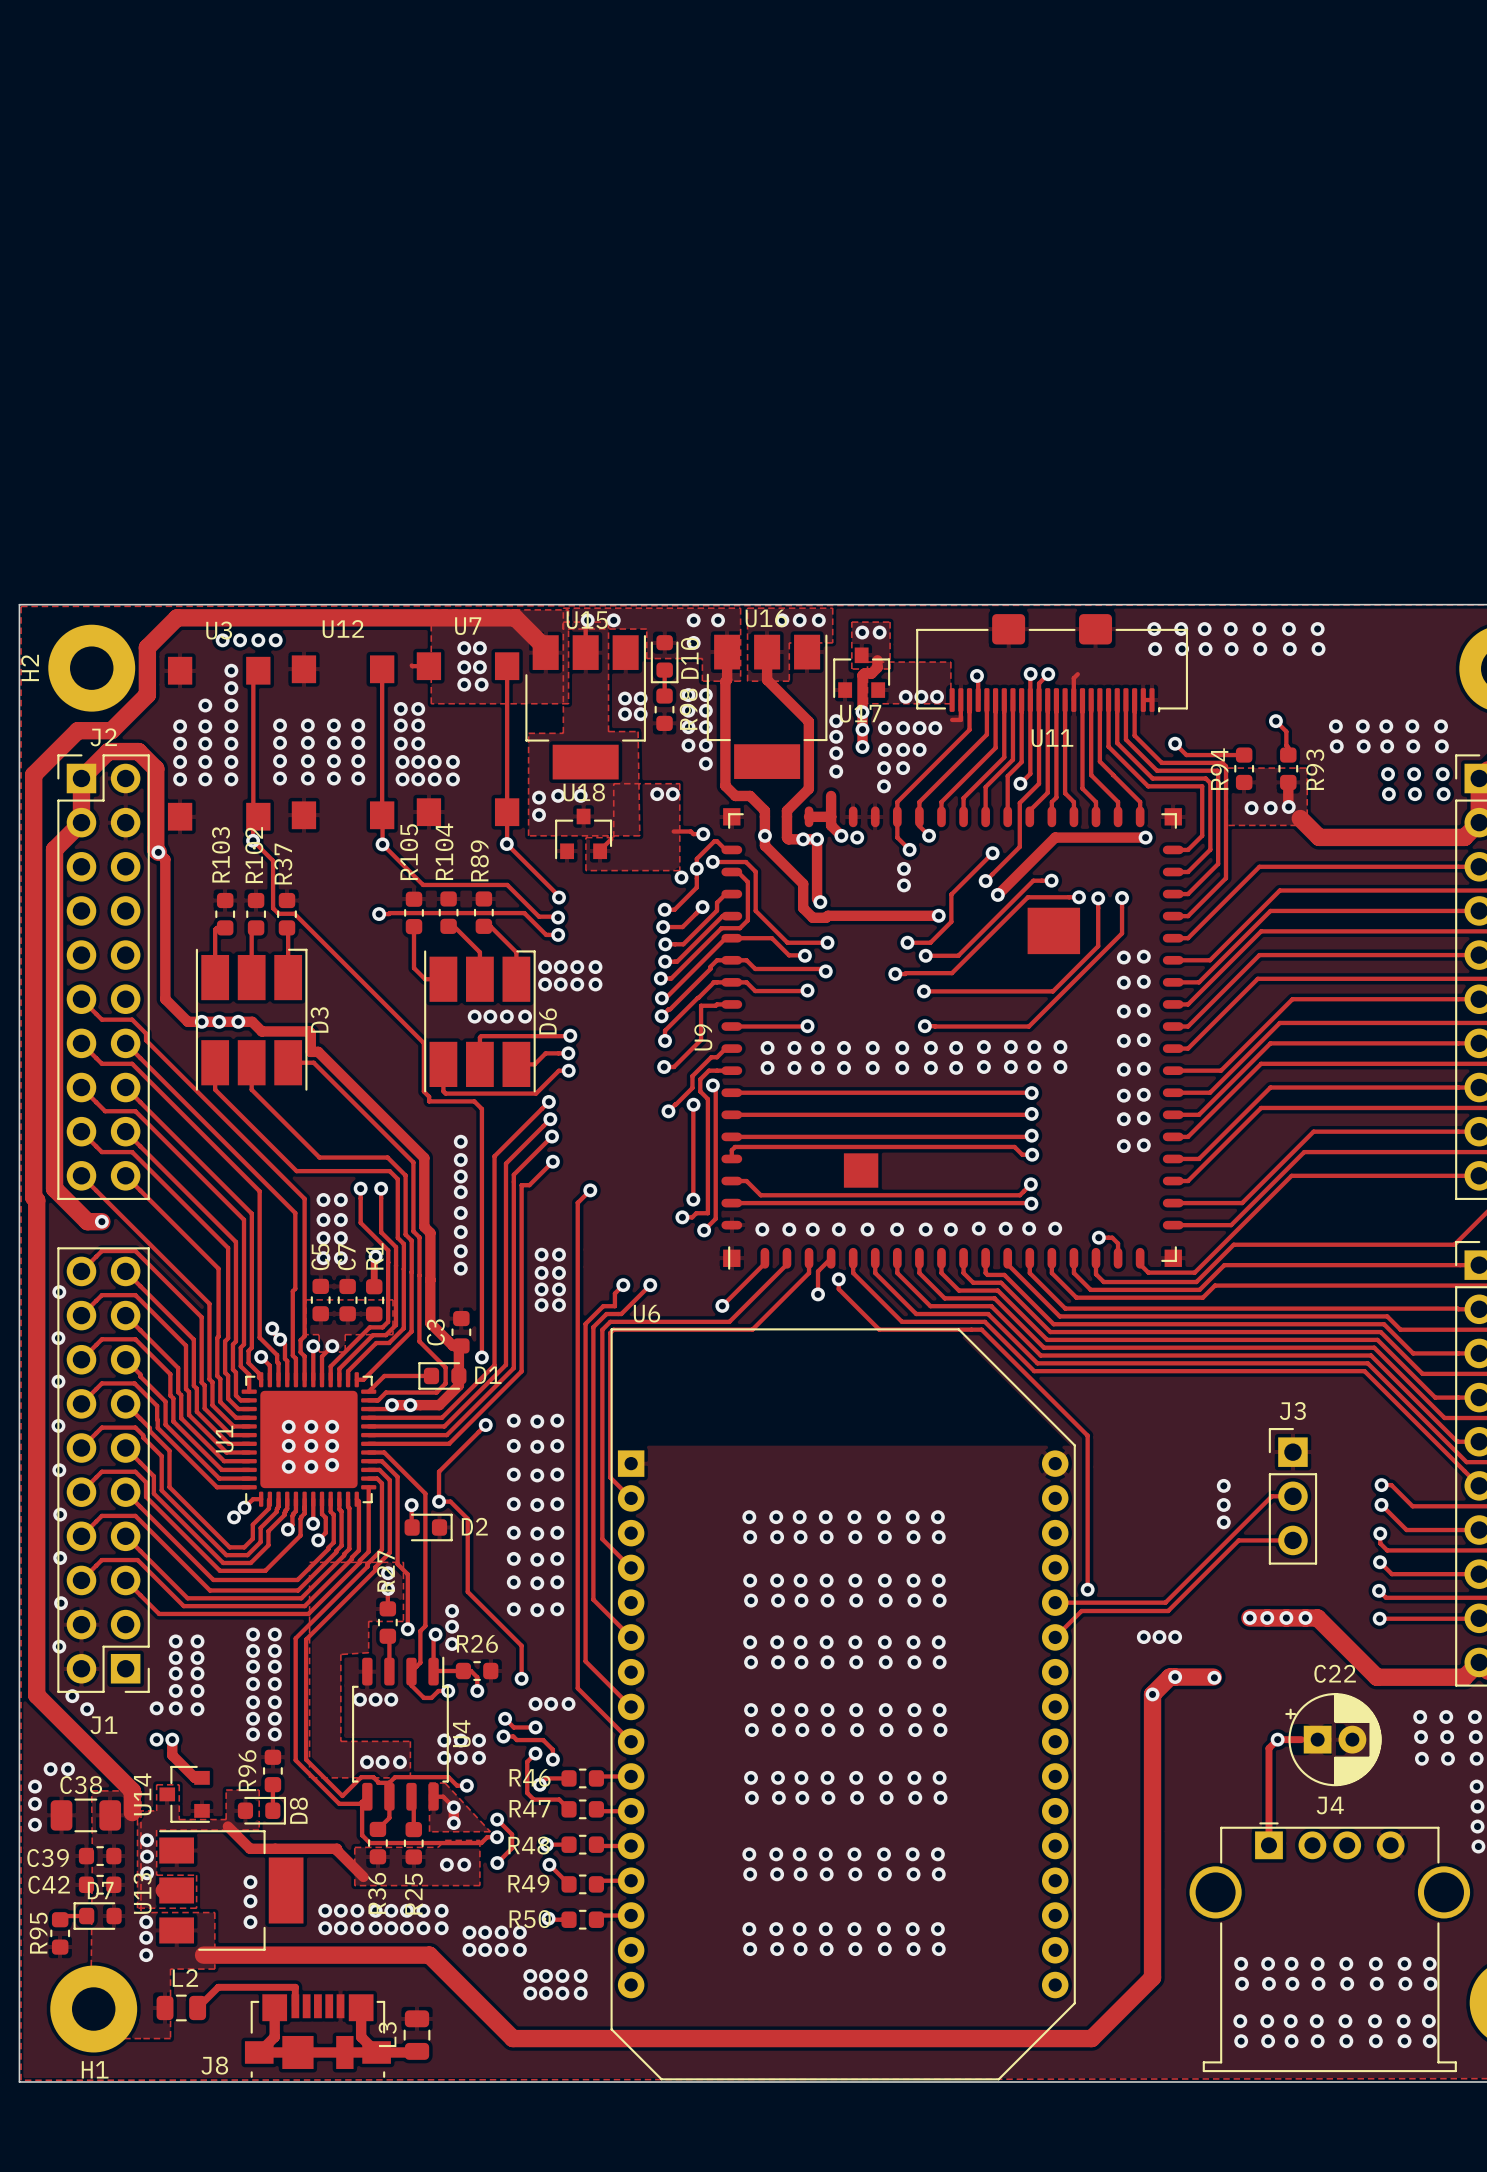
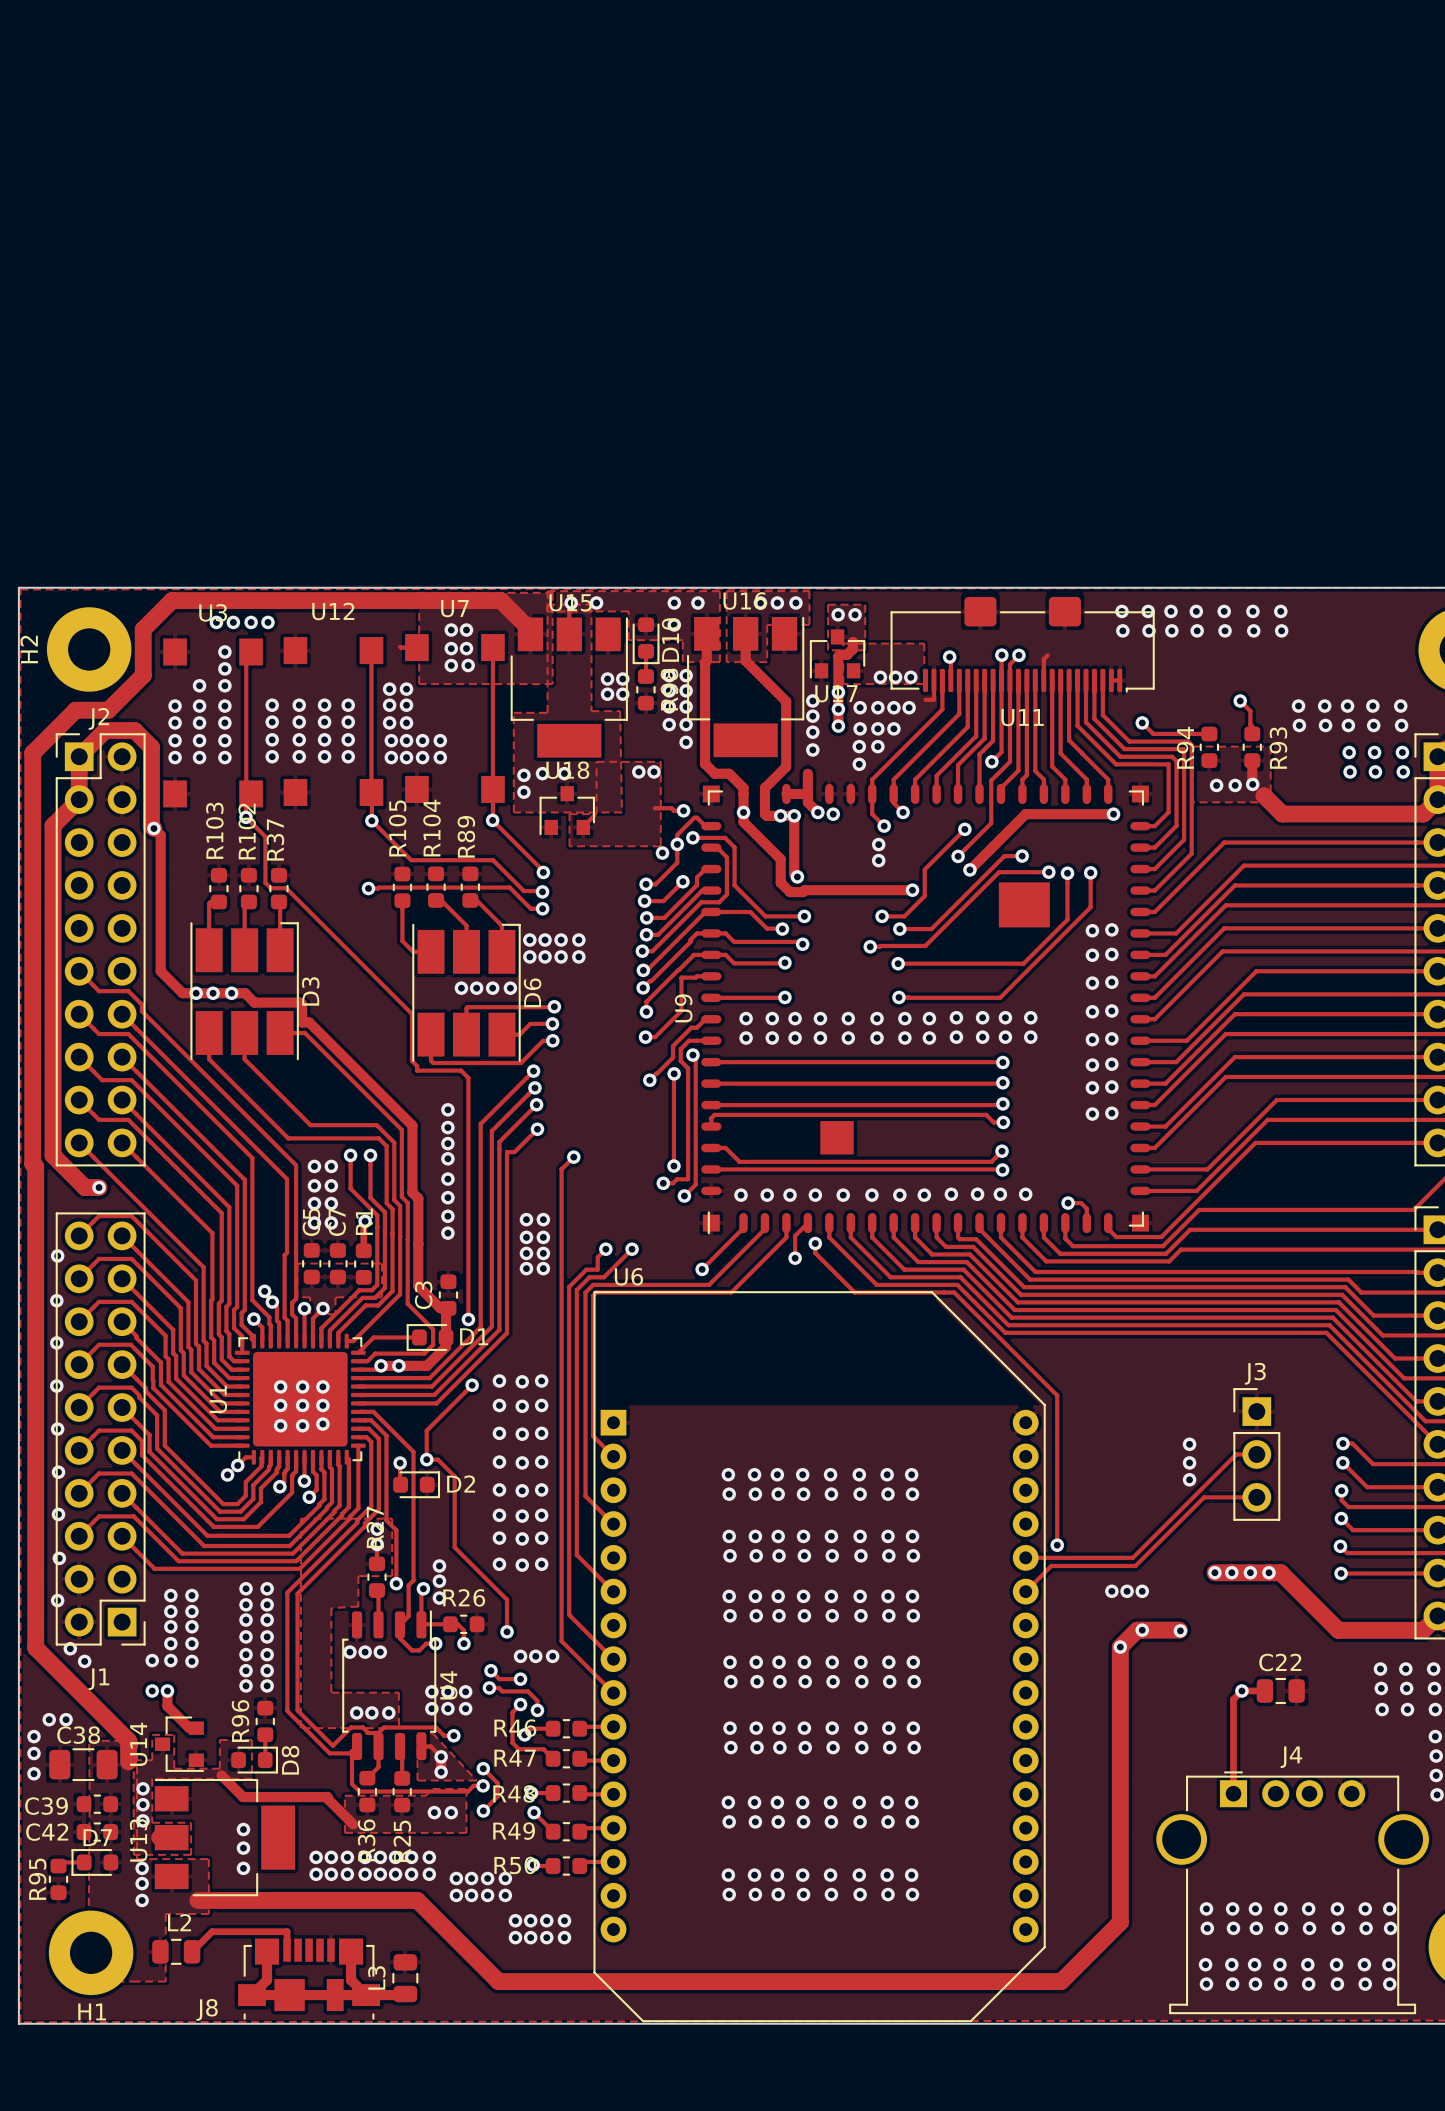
C22 name position: C22 (1335, 1673) -> C22 (1280, 1662)
C22 footprint: [1285, 1693, 1382, 1787] -> [1256, 1677, 1305, 1704]

